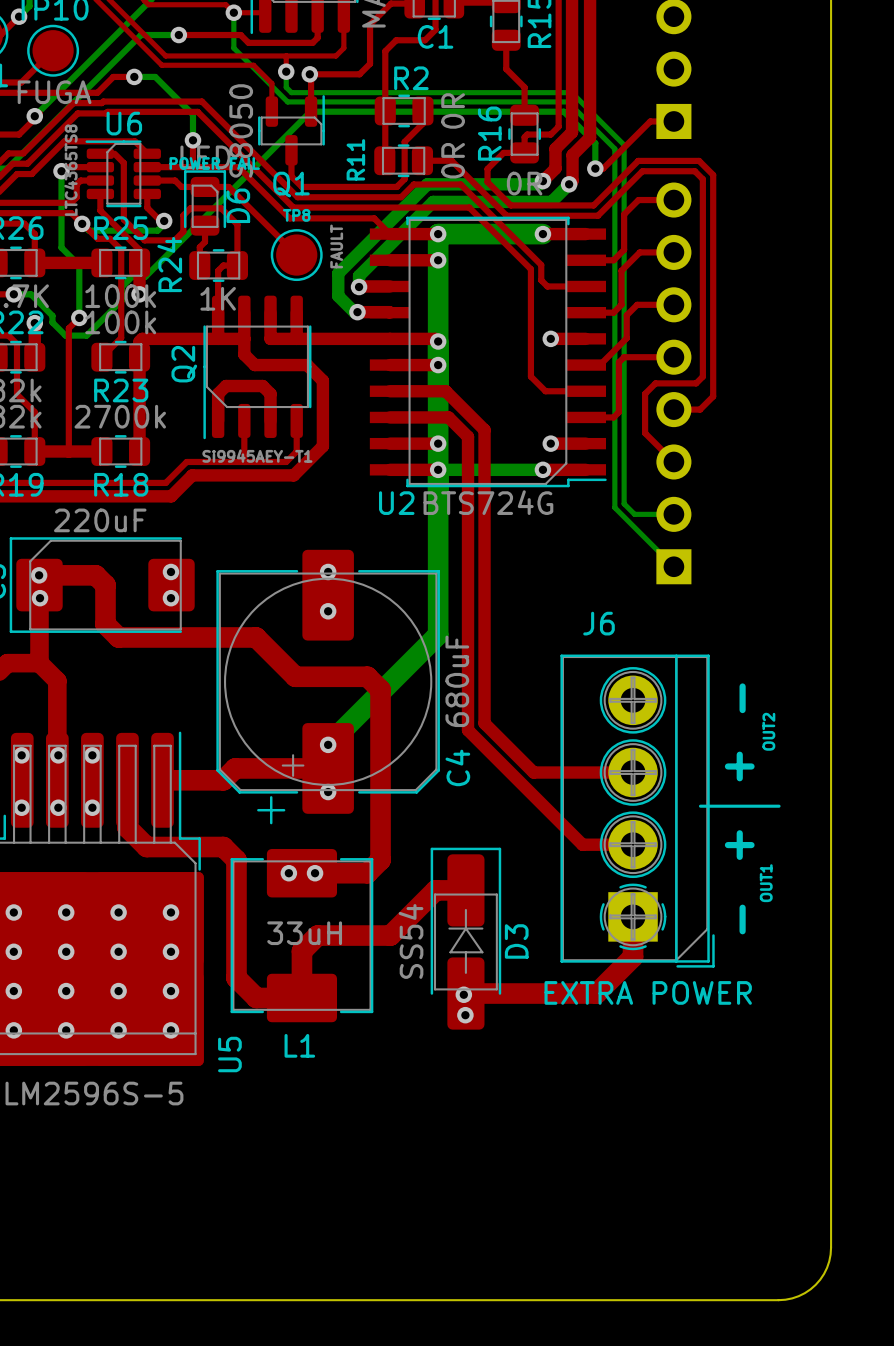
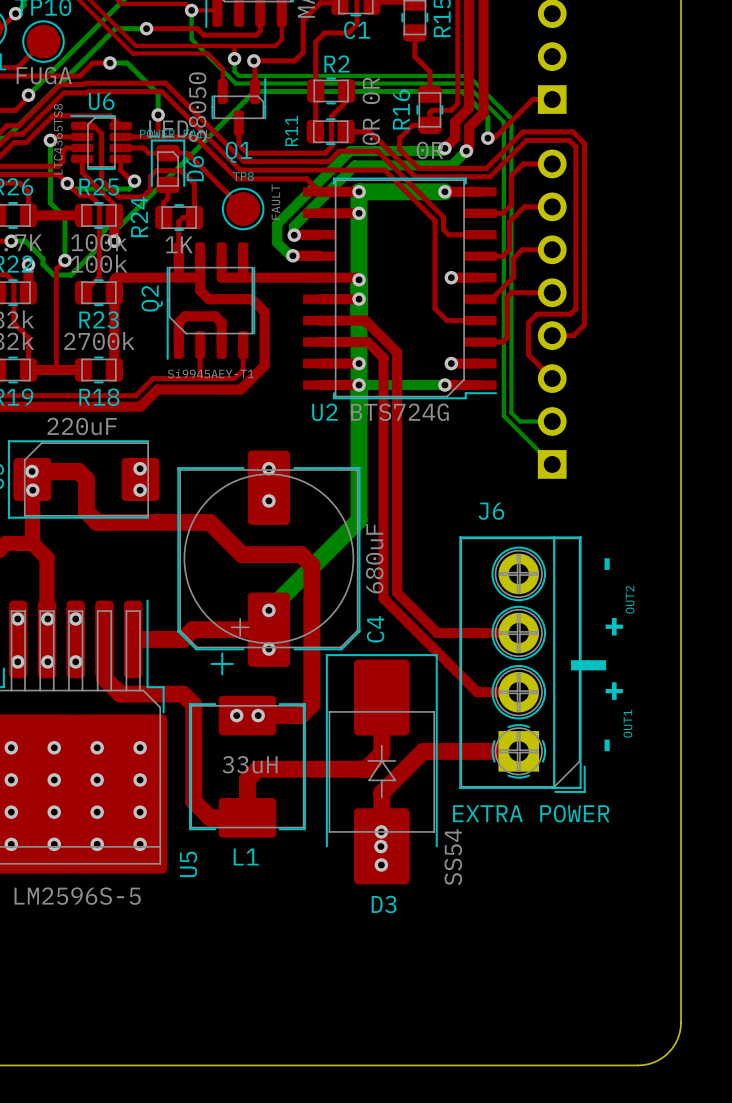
D3 footprint: [430, 847, 502, 1030] -> [325, 654, 438, 885]
top track: (465, 890) (435, 890) (390, 935) (317, 935) (314, 938) -> (381, 697) (381, 753) (365, 769) (257, 769)
top track: (633, 916) (633, 957) (596, 993) (463, 994) (465, 993) -> (518, 751) (423, 751) (381, 792) (381, 827)
D3 value position: SS54 (411, 941) -> SS54 (453, 857)
D3 name position: D3 (516, 941) -> D3 (384, 904)
via: (463, 994) -> none
via: none -> (380, 846)
via: none -> (381, 864)

